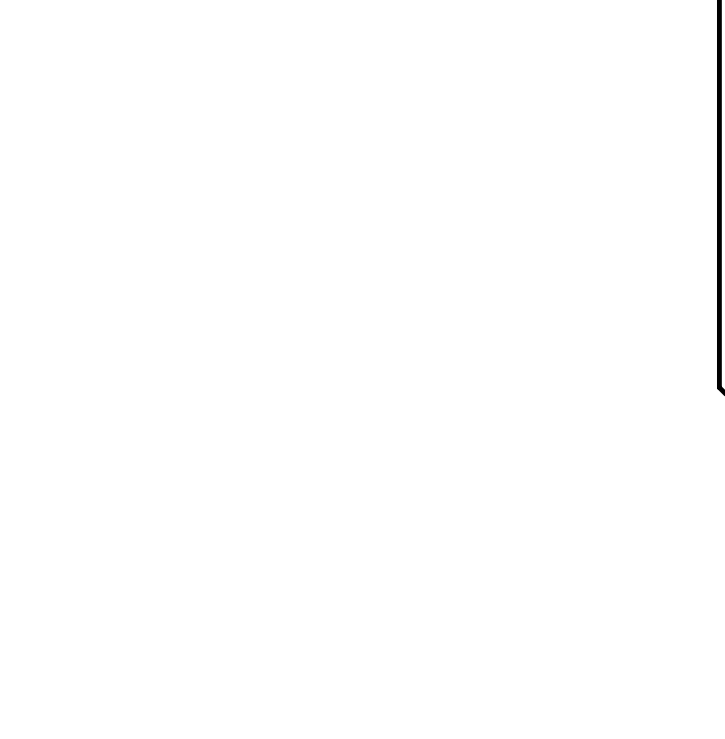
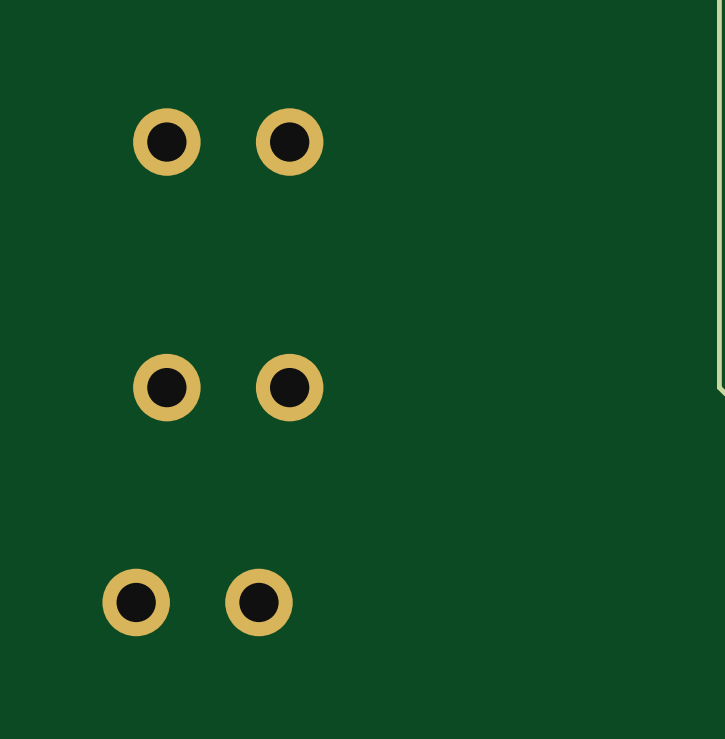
part: none -> (228, 142)
part: none -> (228, 387)
part: none -> (197, 602)

